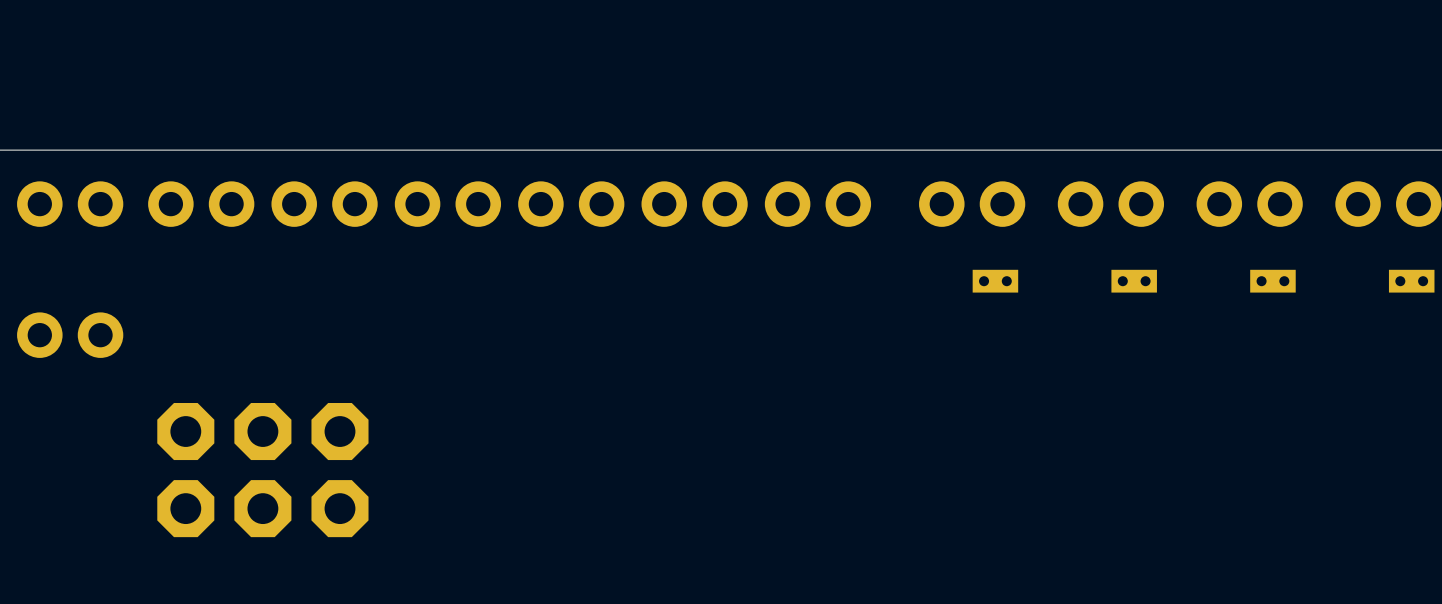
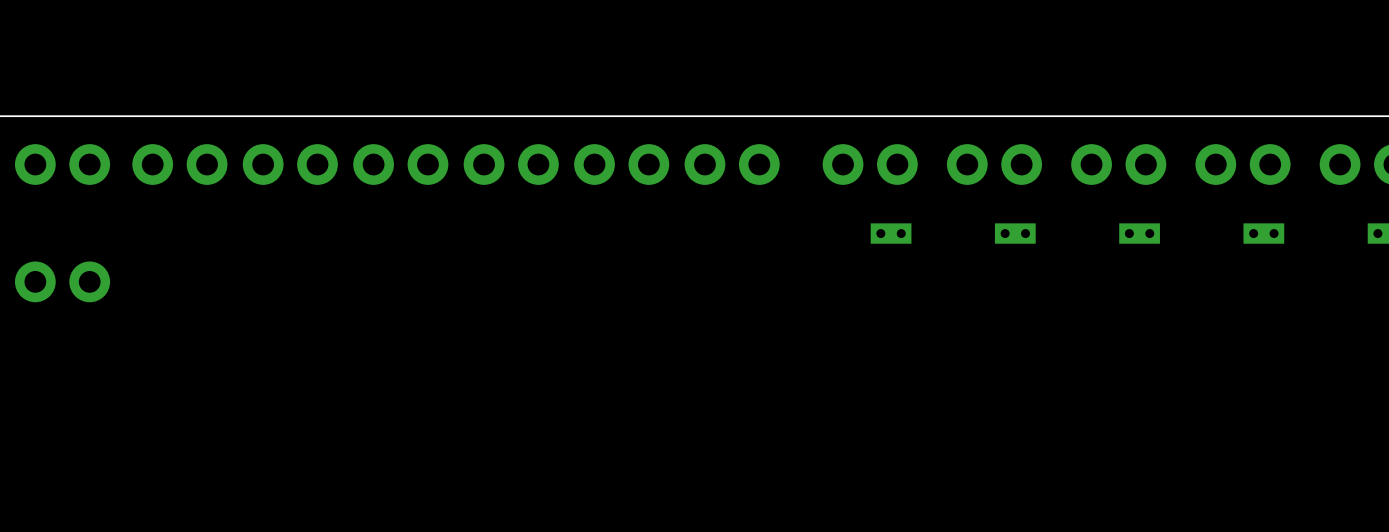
part: (262, 470) -> none

